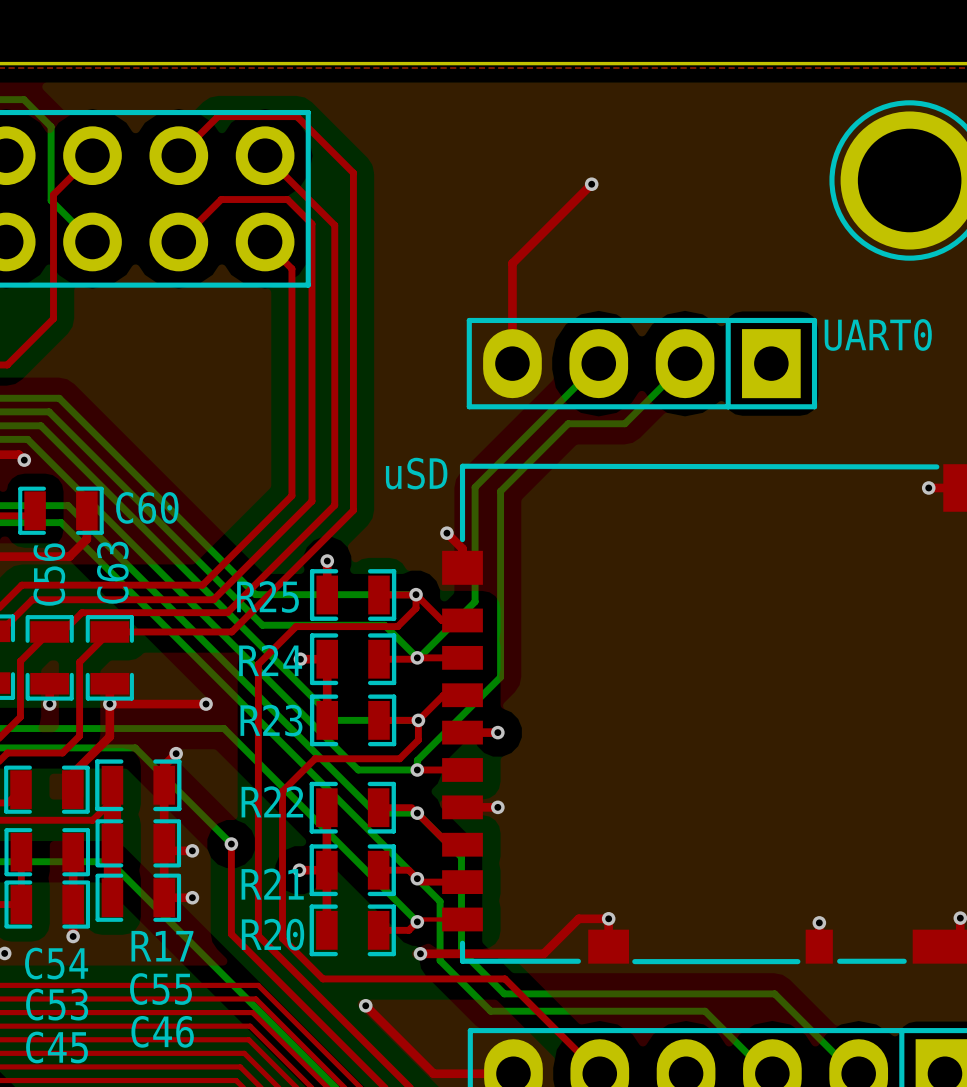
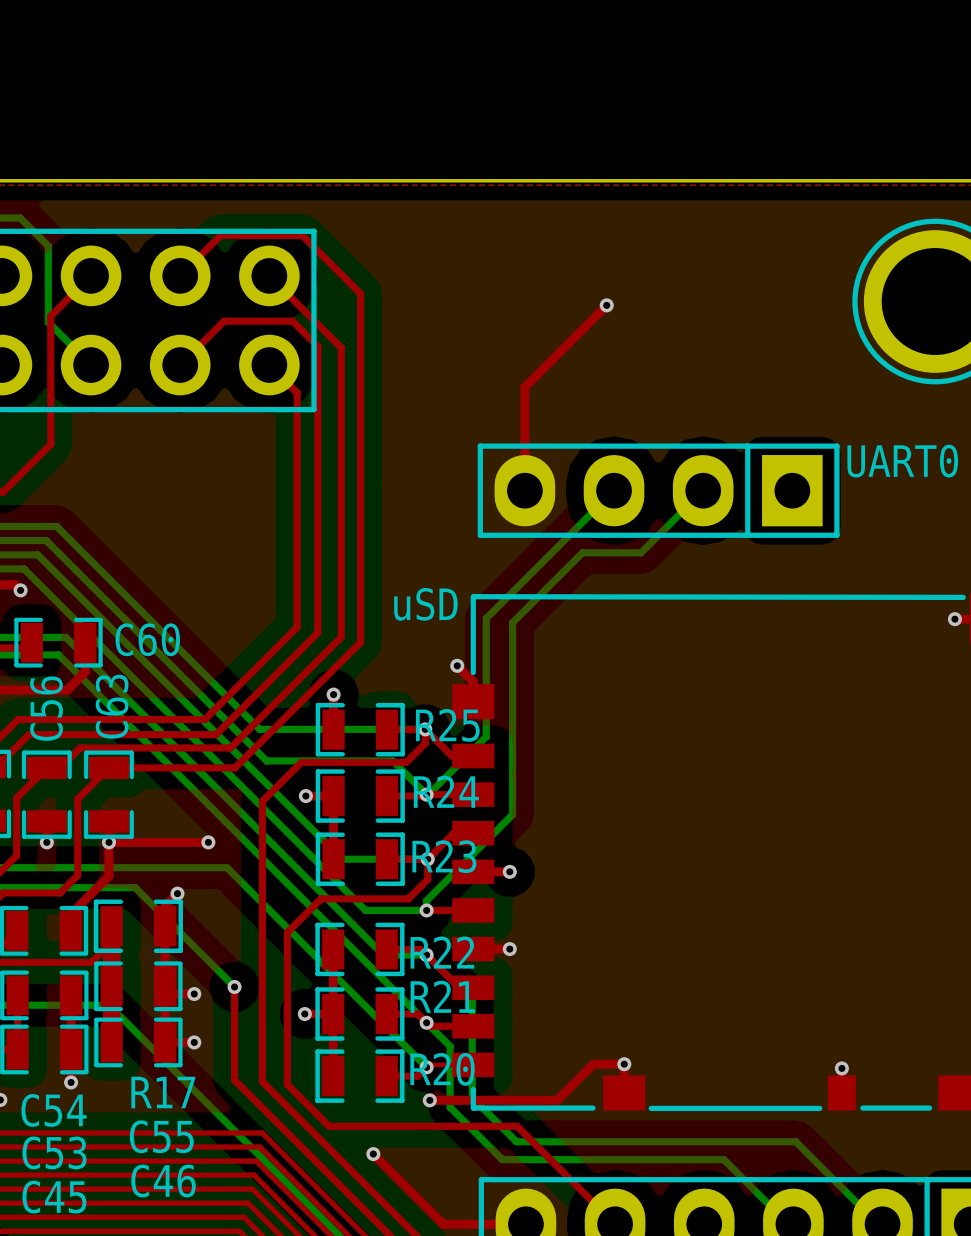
R25 name position: R25 (267, 596) -> R25 (447, 725)
R24 name position: R24 (270, 660) -> R24 (446, 791)
R23 name position: R23 (271, 720) -> R23 (444, 856)
R22 name position: R22 (272, 801) -> R22 (442, 952)
R21 name position: R21 (272, 884) -> R21 (442, 996)
R20 name position: R20 (273, 934) -> R20 (442, 1069)

